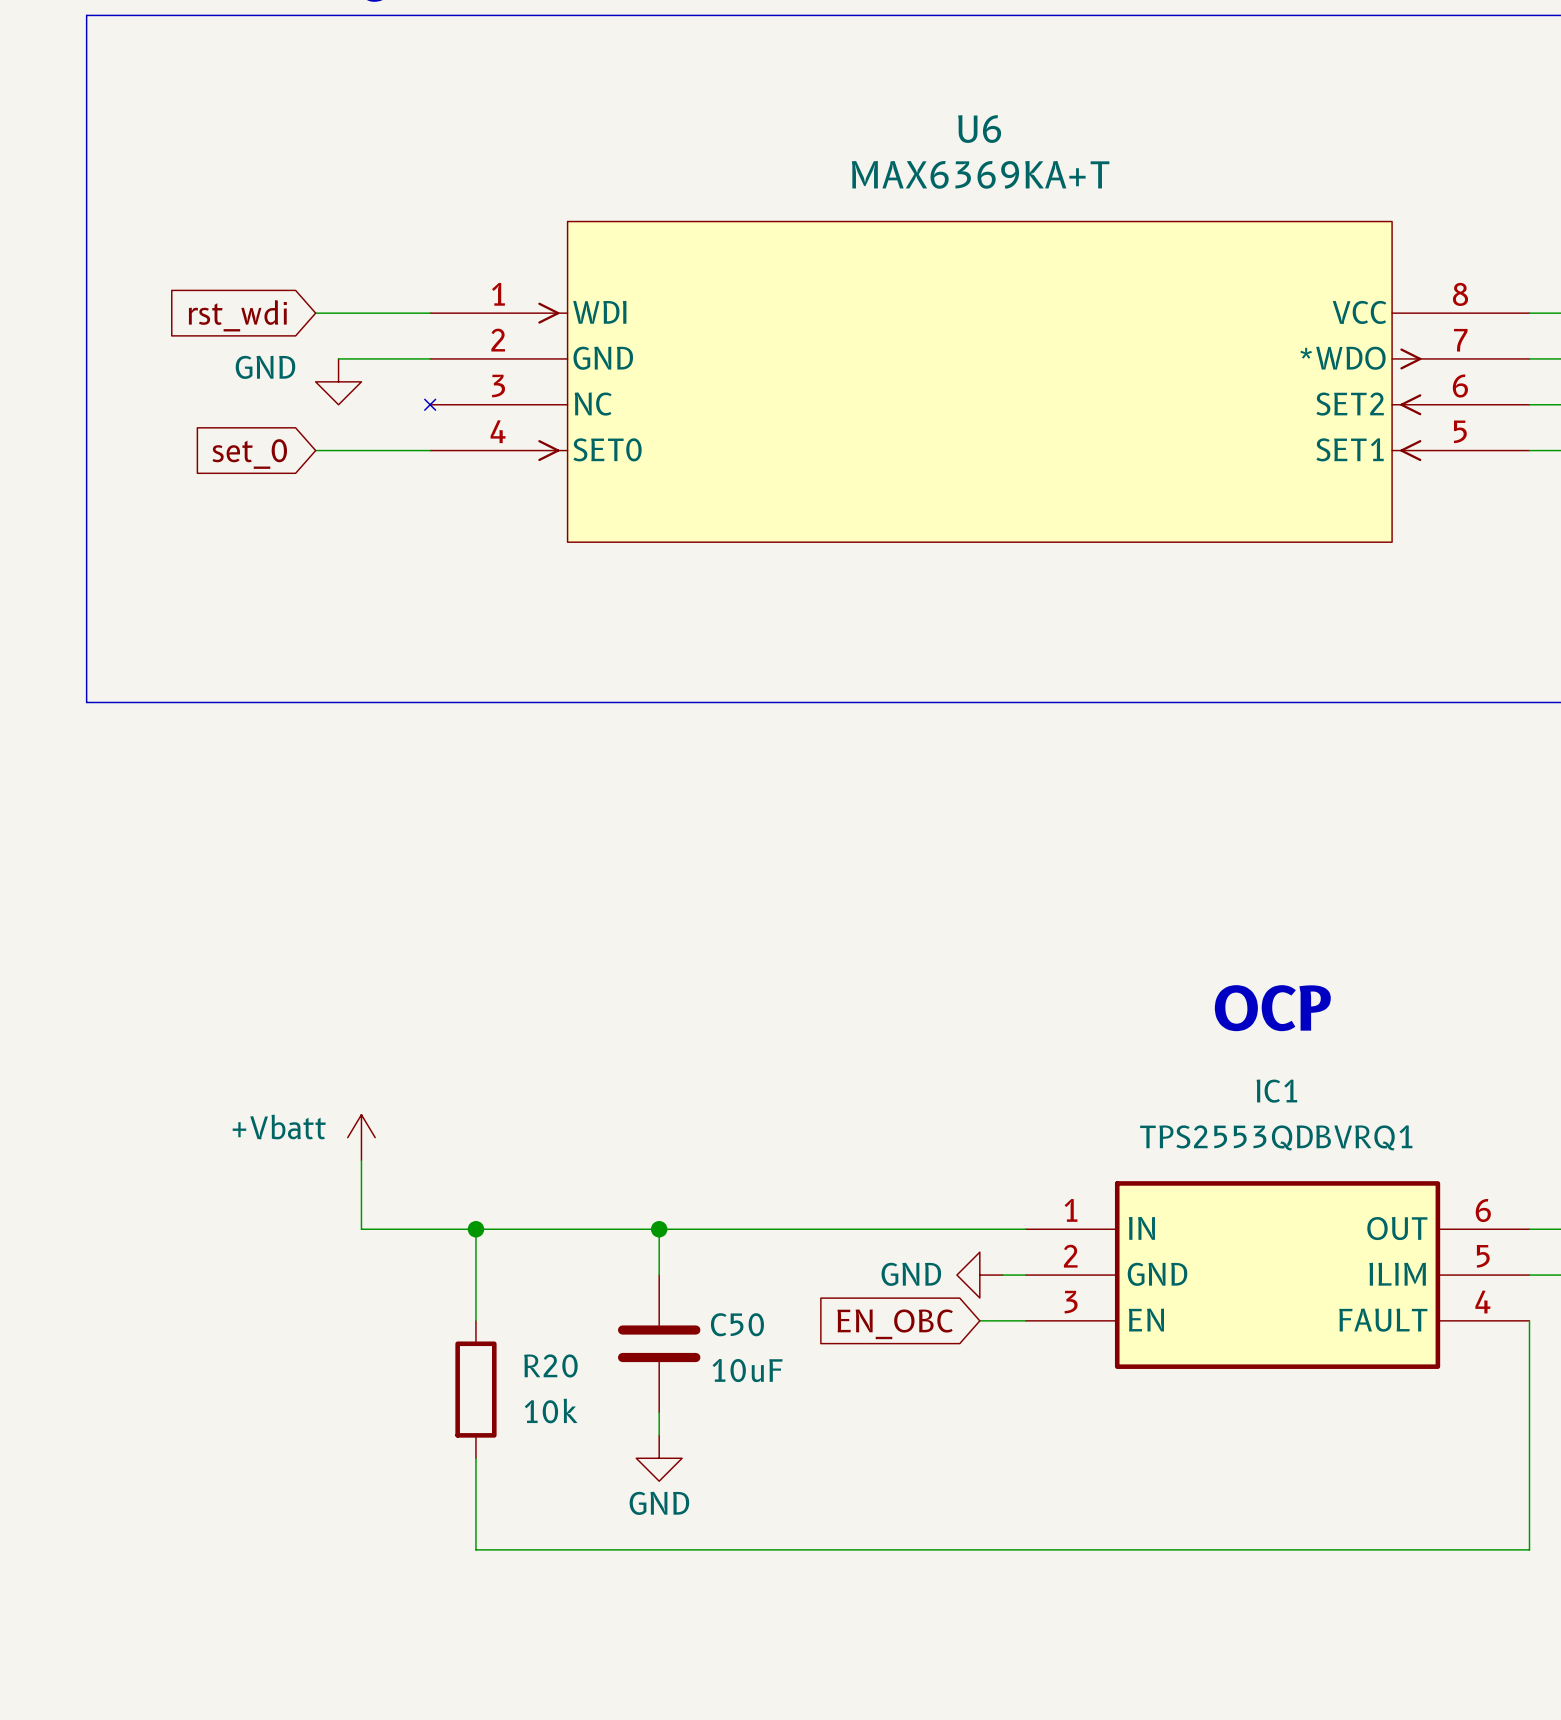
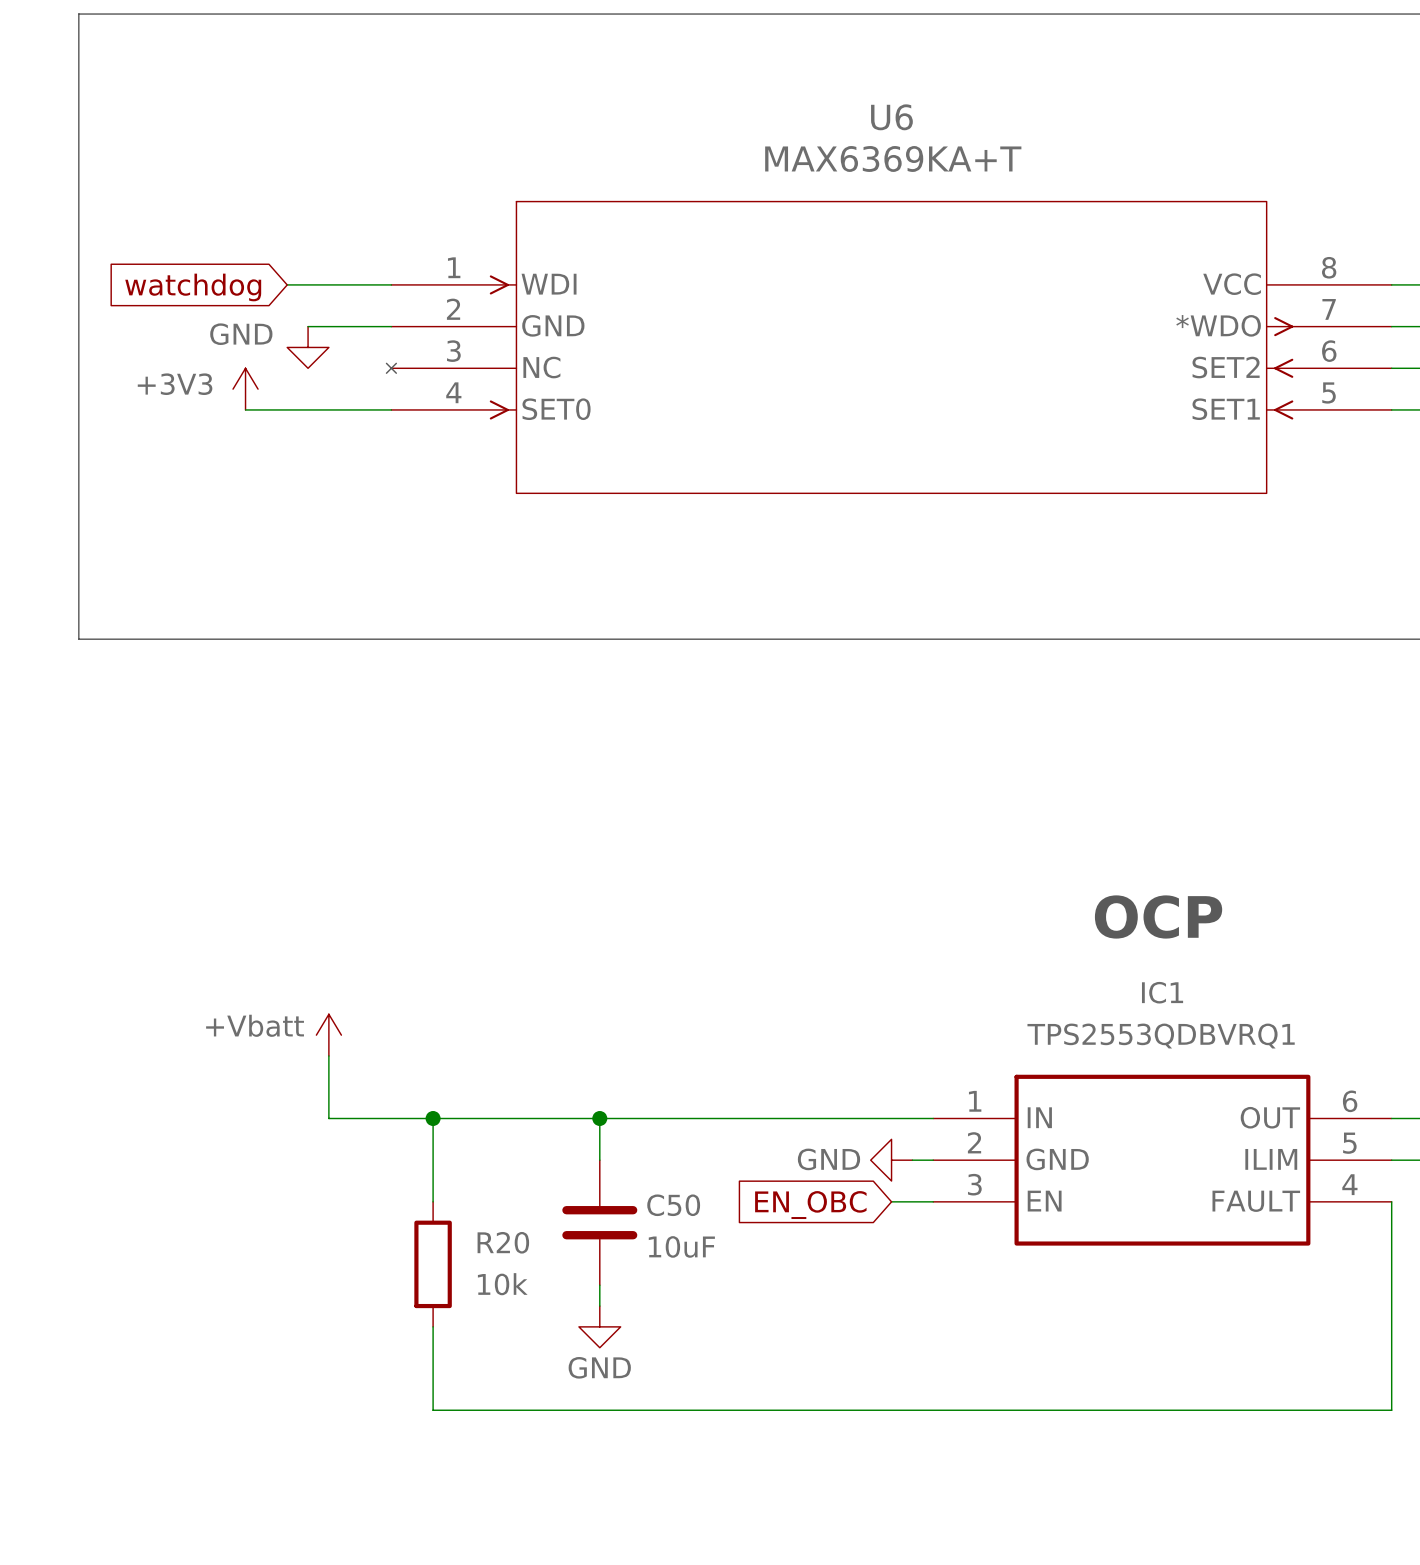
global label: rst_wdi (237, 315) -> watchdog (193, 287)
power symbol: none -> +3V3 (245, 389)
wire: none -> (245, 409) (287, 409)
global label: set_0 (249, 454) -> none

